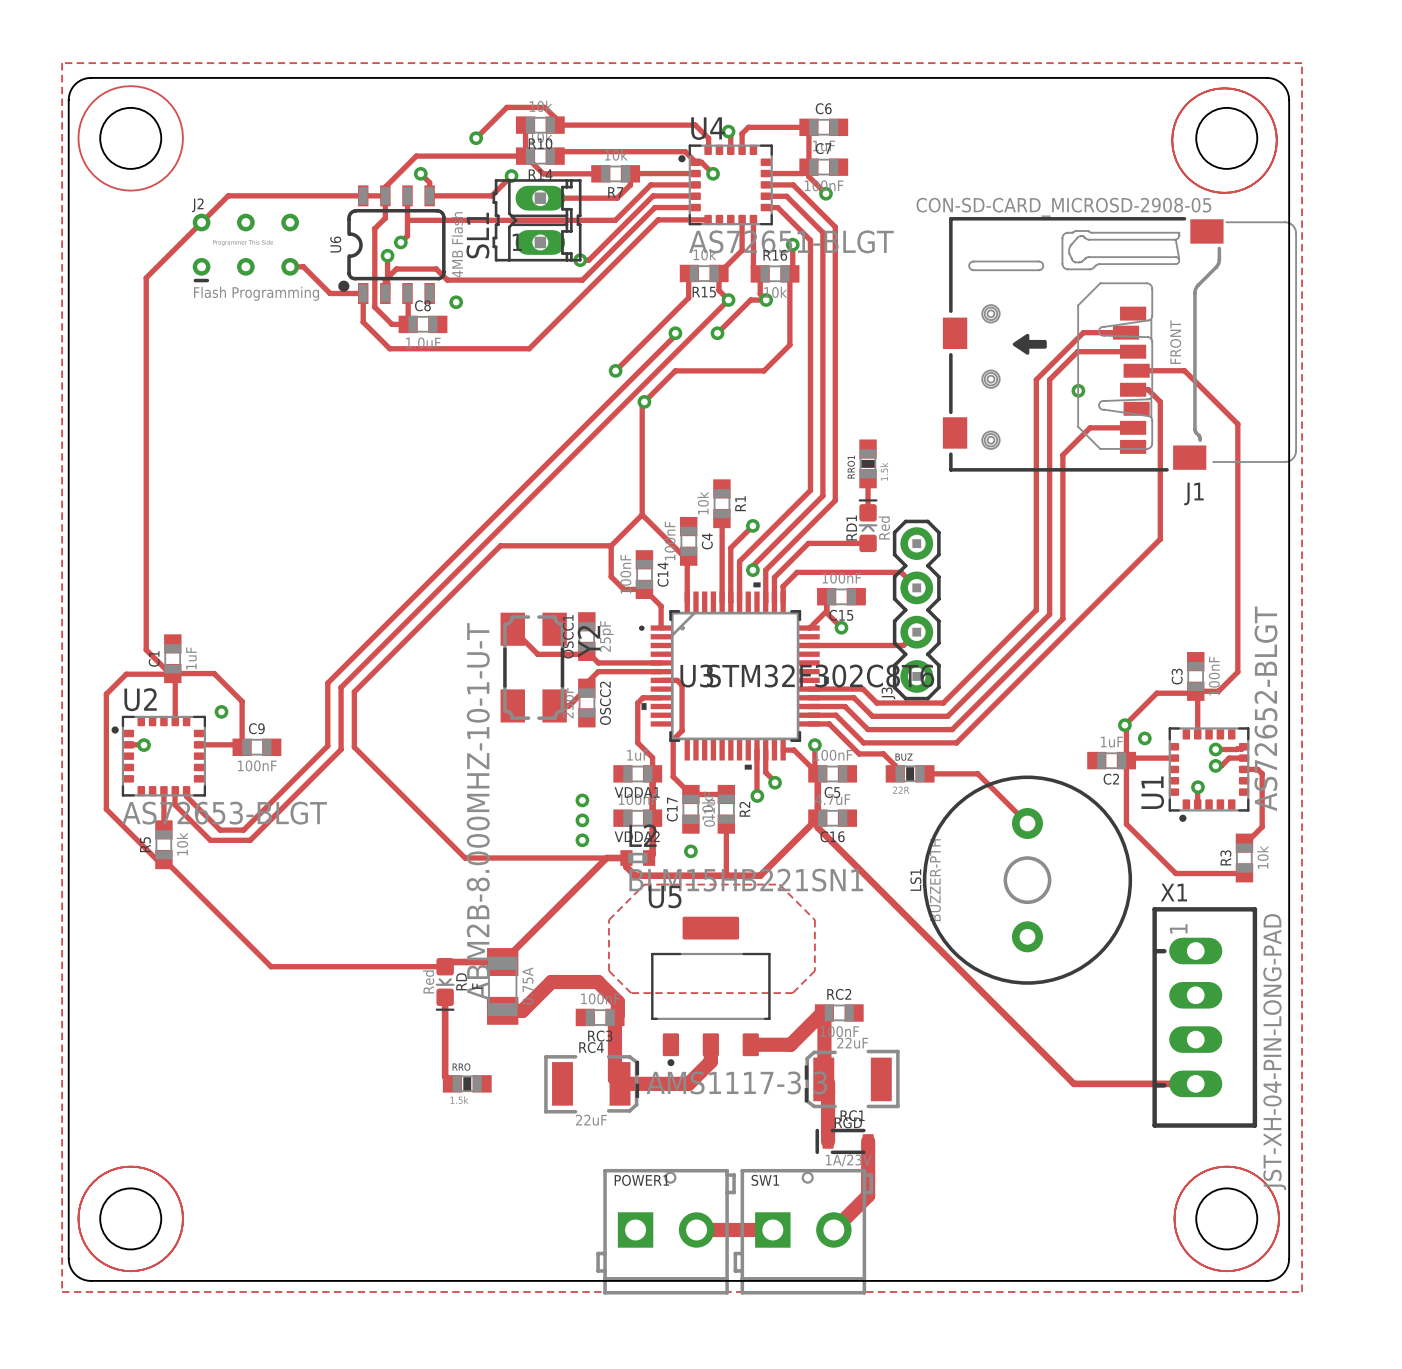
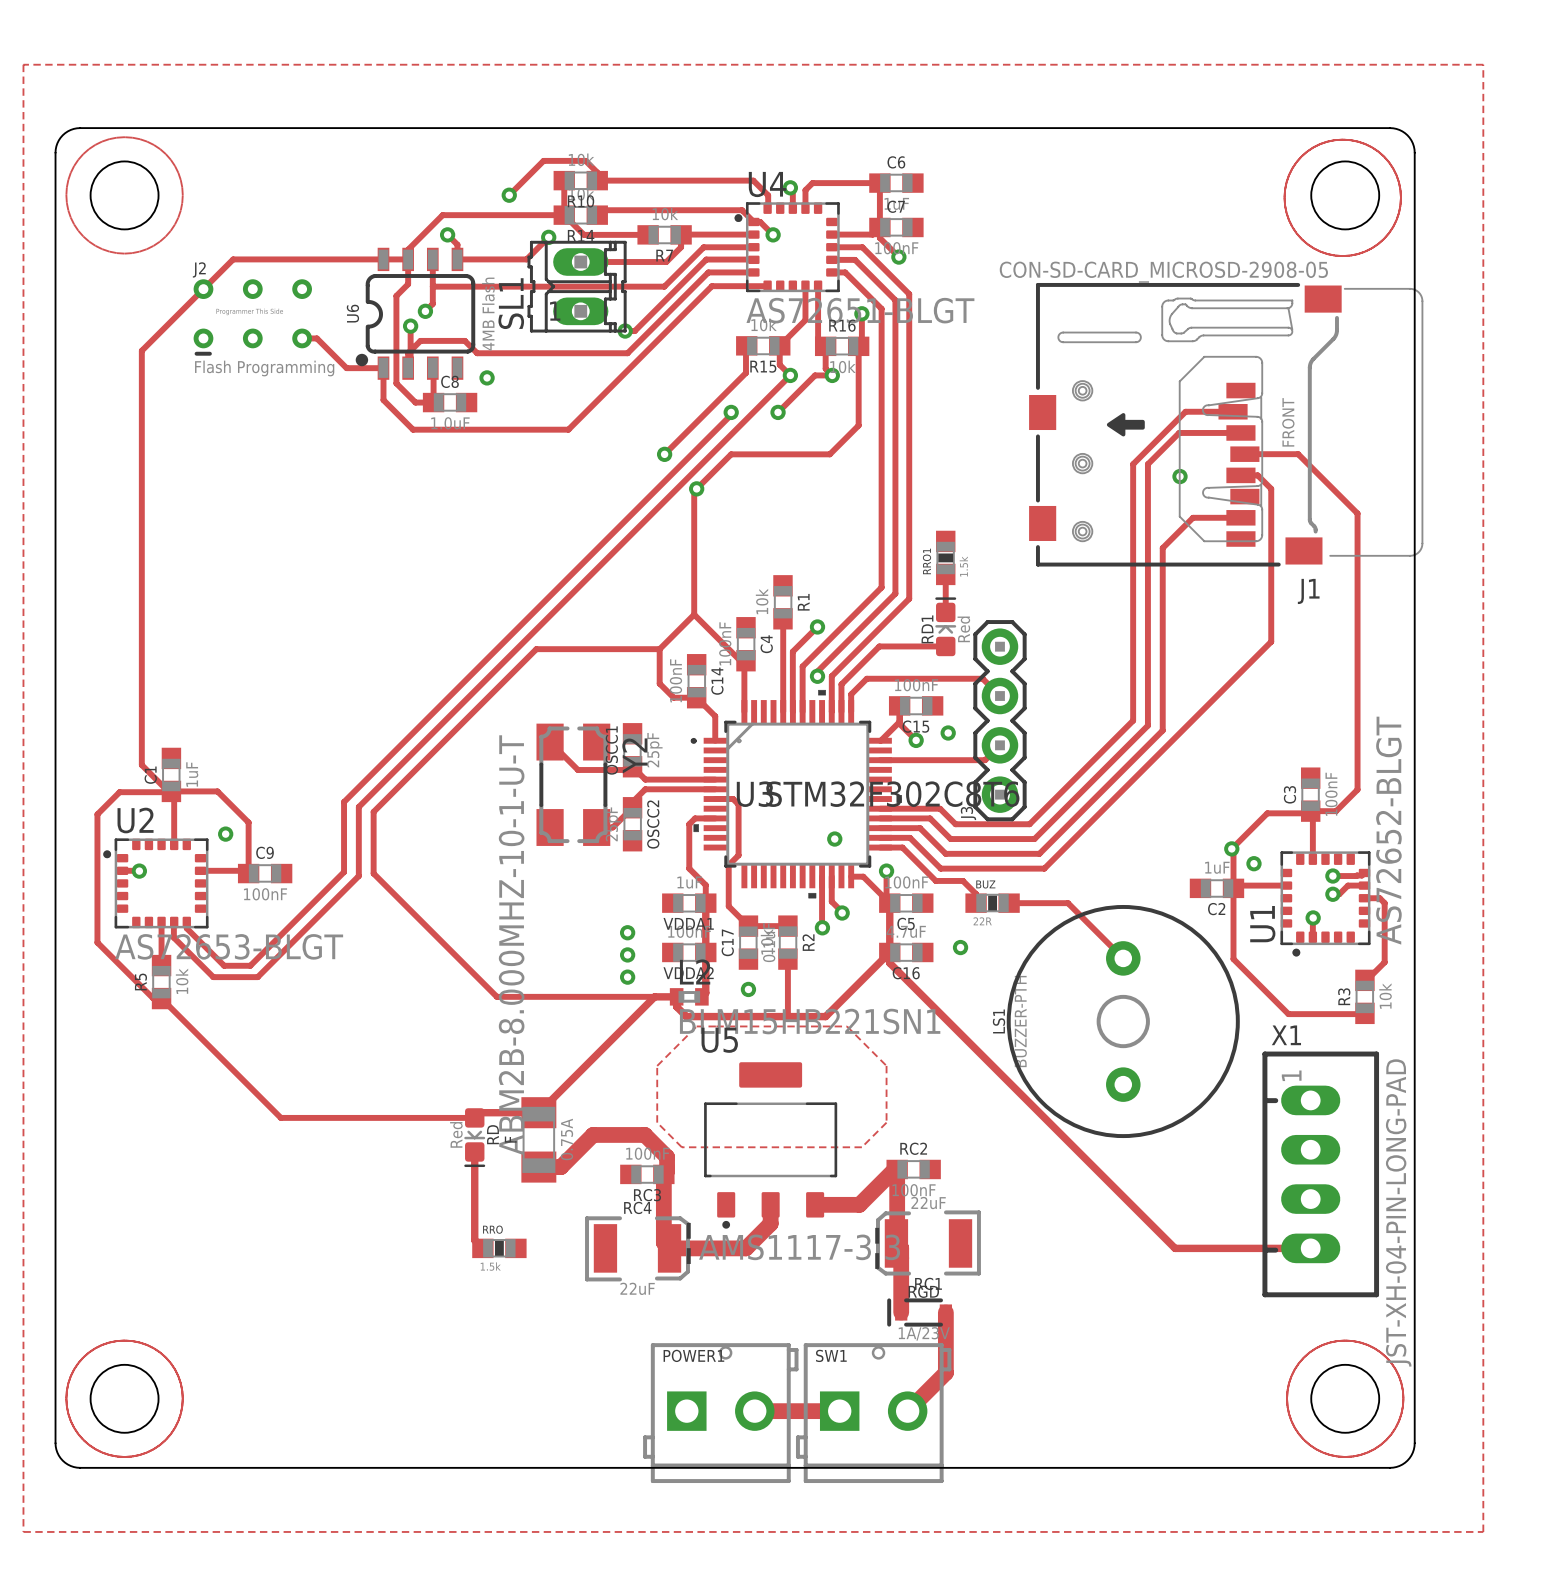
zone outline: (62, 63) (62, 1291) (1302, 1291) (1302, 63) (62, 63) -> (23, 64) (23, 1531) (1483, 1531) (1483, 64) (23, 64)
via: none -> (948, 733)
via: none -> (834, 839)
via: none -> (960, 947)

